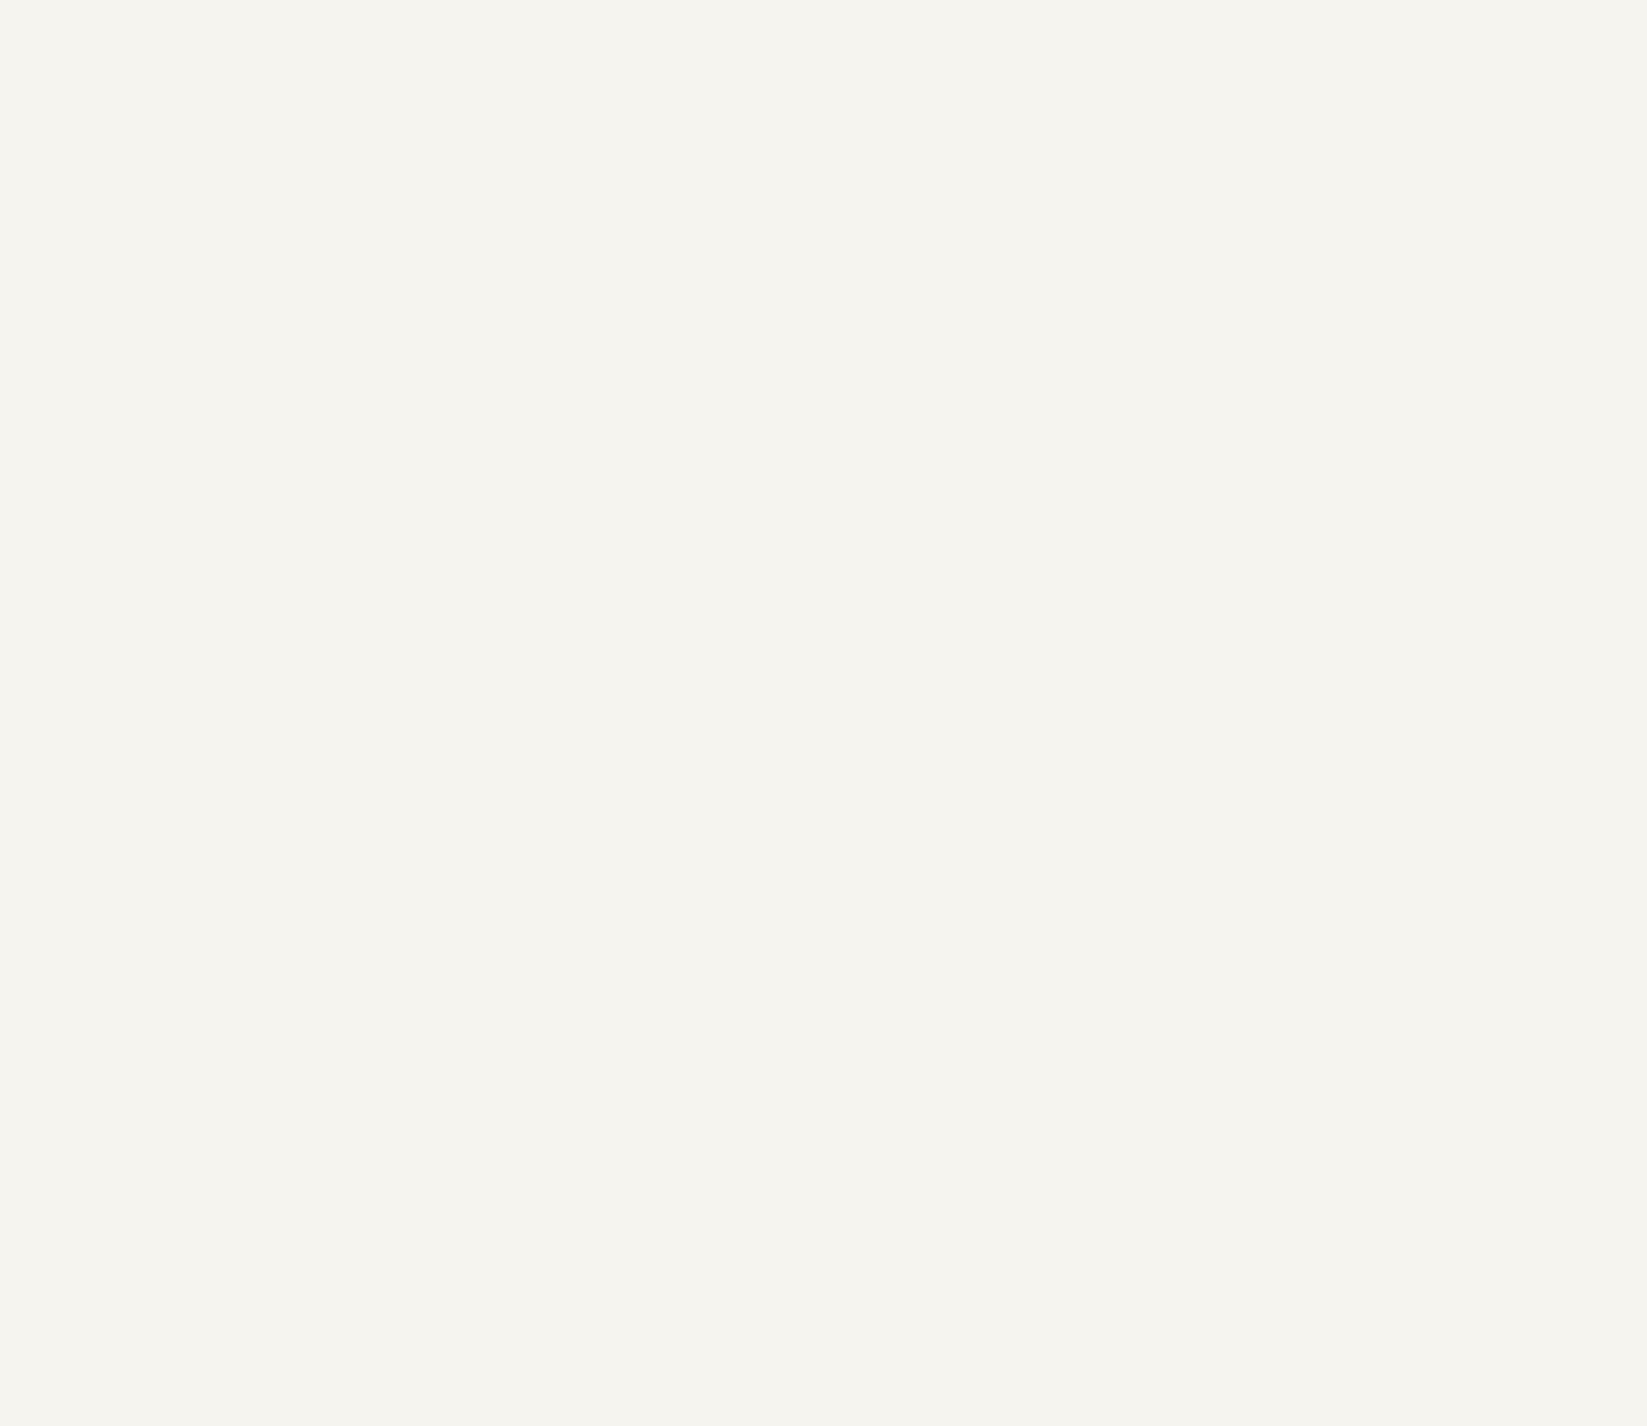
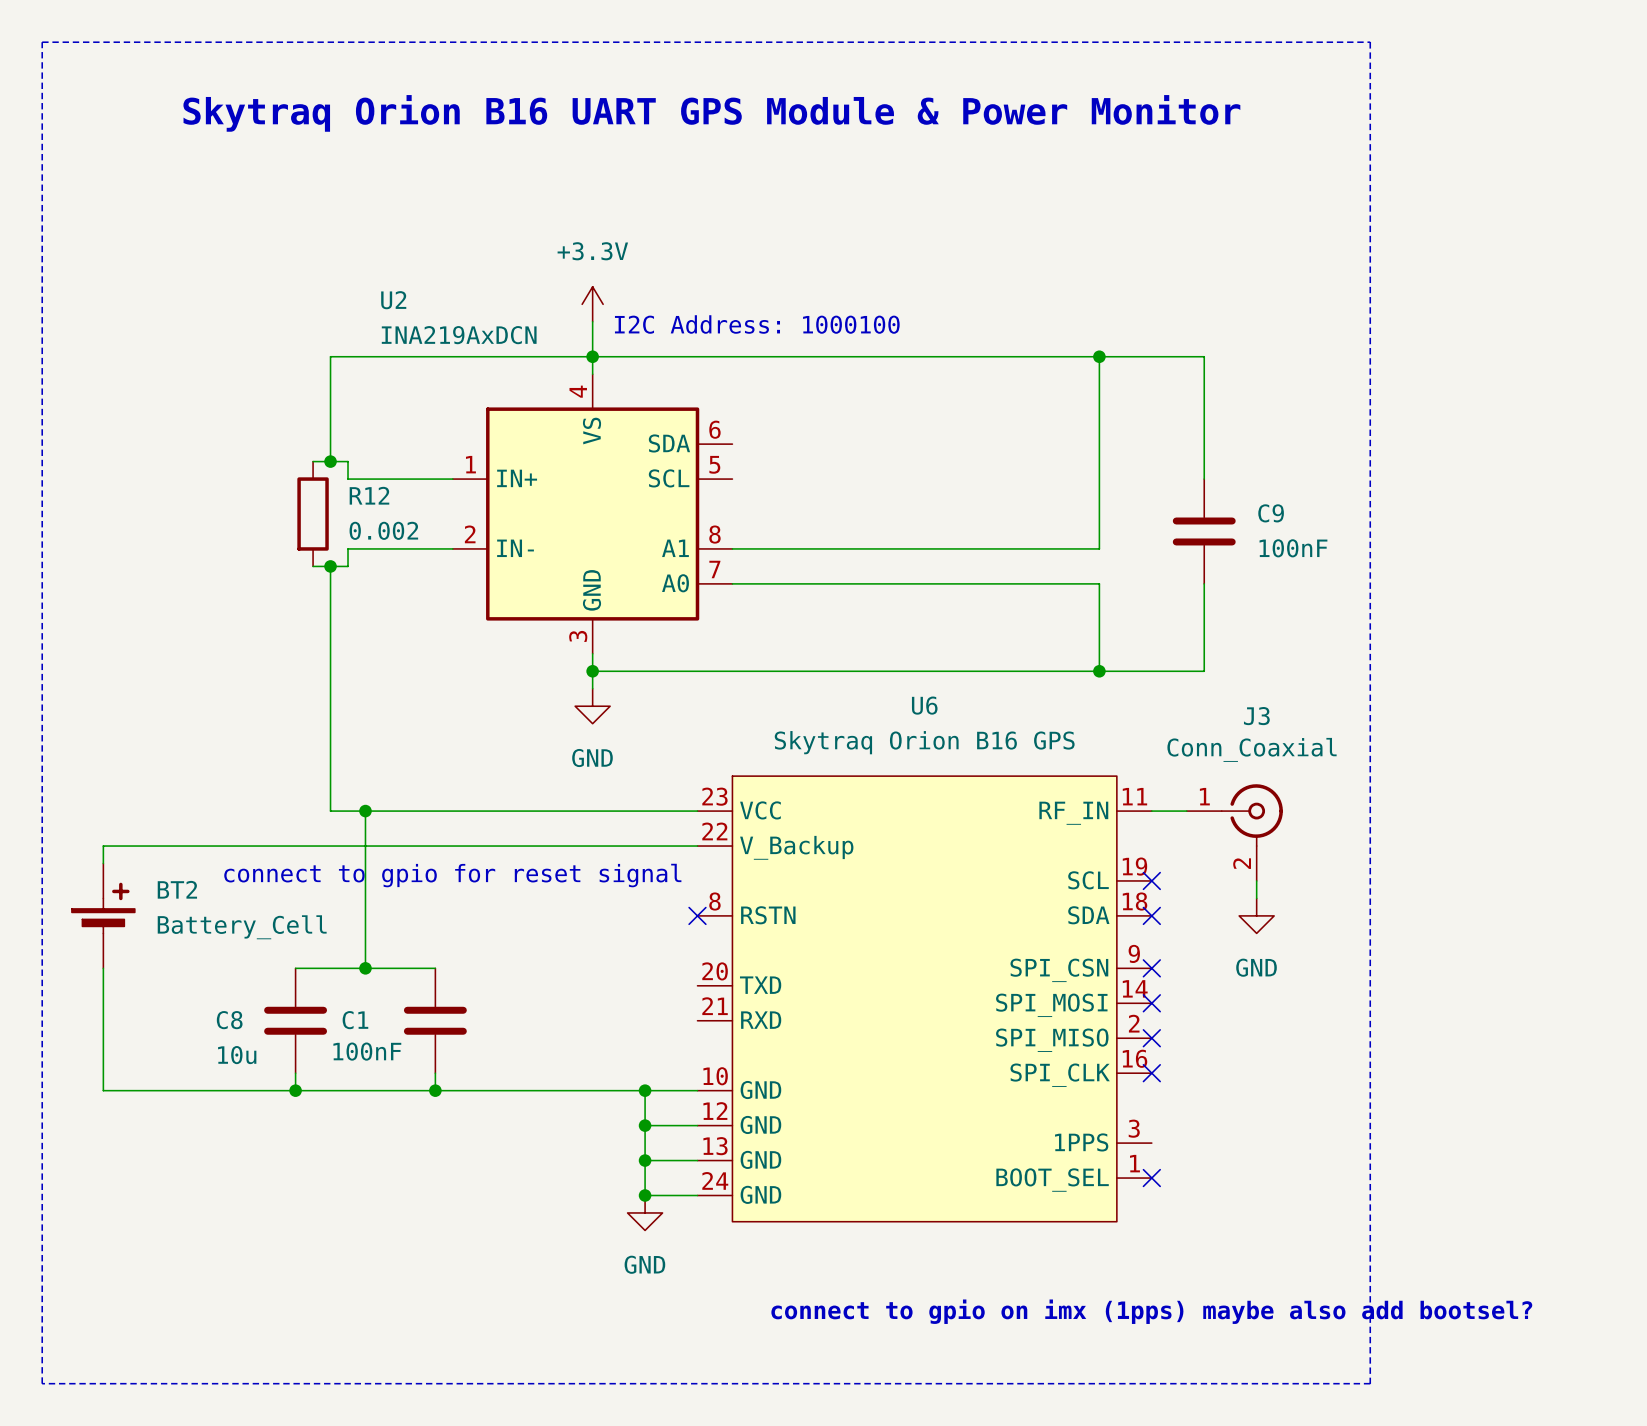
line: none -> (42, 42) (1370, 42) (1370, 1383) (42, 1383) (42, 42)
text: none -> Skytraq Orion B16 UART GPS Module & Power Monitor (711, 113)
power symbol: none -> +3.3V (592, 304)
wire: none -> (592, 321) (592, 374)
text: none -> I2C Address: 1000100 (757, 324)
junction: none -> (592, 356)
wire: none -> (1099, 356) (1099, 548) (732, 548)
junction: none -> (1099, 356)
wire: none -> (313, 461) (348, 461) (348, 479) (452, 479)
wire: none -> (330, 461) (330, 356) (1204, 356) (1204, 479)
junction: none -> (330, 461)
R12: none -> 0.002 (313, 514)
U2: none -> INA219AxDCN (592, 514)
C9: none -> 100nF (1204, 531)
wire: none -> (452, 548) (348, 548) (348, 566) (313, 566)
wire: none -> (330, 566) (330, 811) (697, 811)
junction: none -> (330, 566)
wire: none -> (732, 583) (1099, 583) (1099, 671)
wire: none -> (1204, 583) (1204, 671) (592, 671)
wire: none -> (592, 653) (592, 688)
junction: none -> (592, 671)
junction: none -> (1099, 671)
power symbol: none -> GND (592, 706)
wire: none -> (365, 811) (365, 968)
junction: none -> (365, 811)
wire: none -> (1151, 811) (1186, 811)
J3: none -> Conn_Coaxial (1234, 832)
wire: none -> (697, 846) (103, 846) (103, 863)
text: none -> connect to gpio for reset signal (452, 875)
no-connect mark: none -> (1151, 880)
wire: none -> (1256, 880) (1256, 898)
BT2: none -> Battery_Cell (103, 915)
no-connect mark: none -> (697, 915)
no-connect mark: none -> (1151, 915)
power symbol: none -> GND (1256, 915)
wire: none -> (103, 968) (103, 1090) (697, 1090)
wire: none -> (295, 968) (435, 968)
junction: none -> (365, 968)
no-connect mark: none -> (1151, 968)
U6: none -> Skytraq Orion B16 GPS (924, 998)
no-connect mark: none -> (1151, 1003)
C8: none -> 10u (295, 1020)
C1: none -> 100nF (435, 1020)
no-connect mark: none -> (1151, 1038)
wire: none -> (295, 1073) (295, 1090)
wire: none -> (435, 1073) (435, 1090)
no-connect mark: none -> (1151, 1073)
junction: none -> (295, 1090)
junction: none -> (435, 1090)
wire: none -> (645, 1090) (645, 1195) (697, 1195)
junction: none -> (645, 1090)
wire: none -> (645, 1125) (697, 1125)
junction: none -> (645, 1125)
wire: none -> (645, 1160) (697, 1160)
junction: none -> (645, 1160)
no-connect mark: none -> (1151, 1178)
junction: none -> (645, 1195)
power symbol: none -> GND (645, 1212)
text: none -> connect to gpio on imx (1pps) maybe also add bootsel? (1151, 1311)

